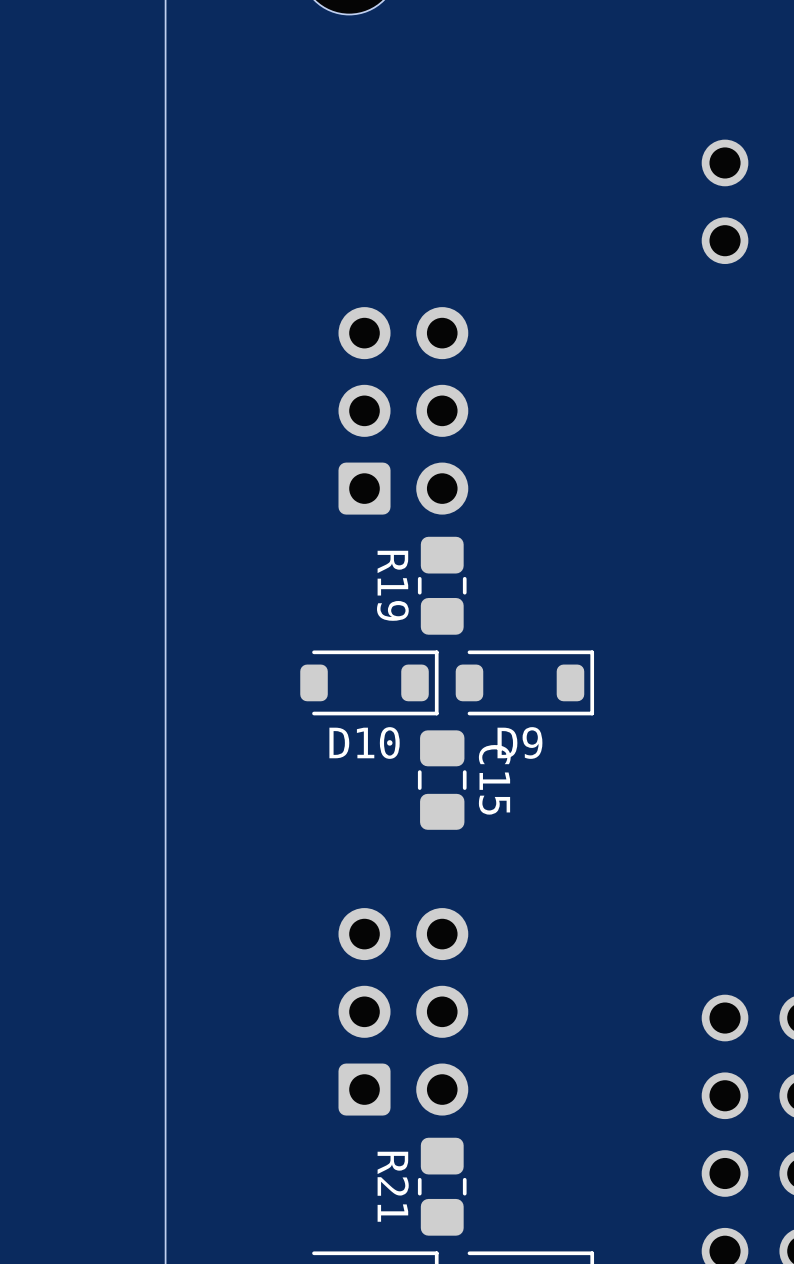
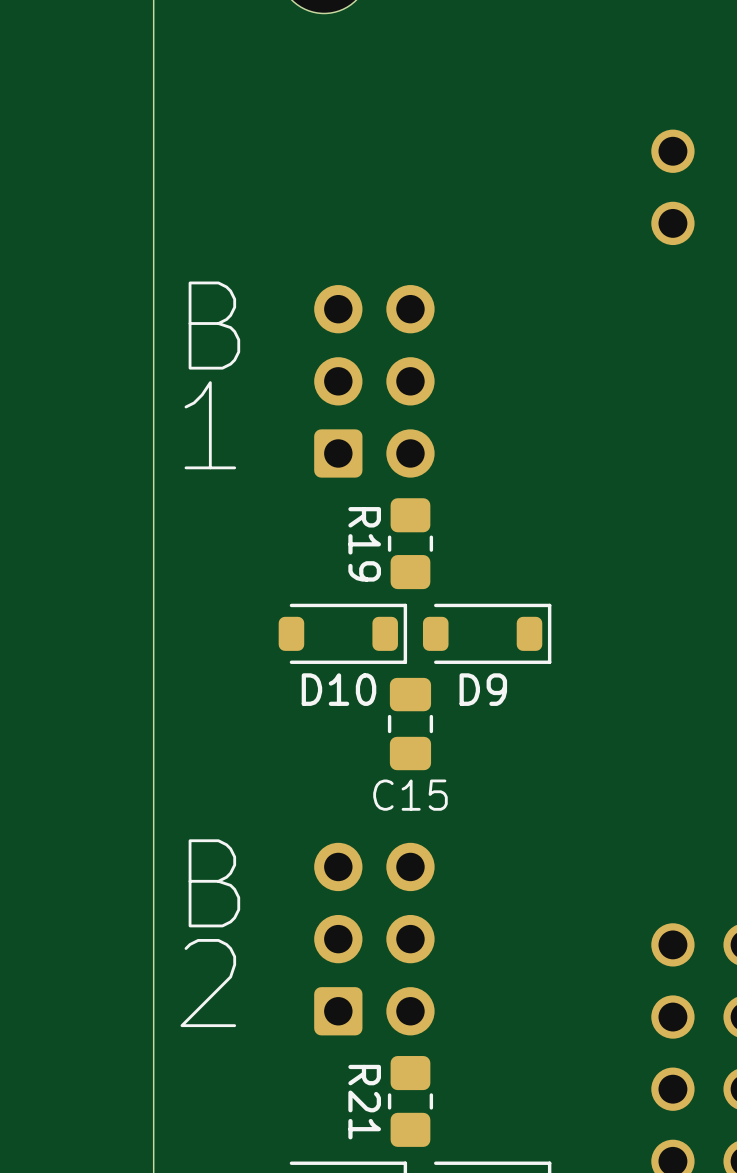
text: none -> B (214, 325)
text: none -> 1 (210, 425)
C15 name rotation: 0° (494, 779) -> 90° counterclockwise (410, 795)
text: none -> B (214, 883)
text: none -> 2 (208, 983)

